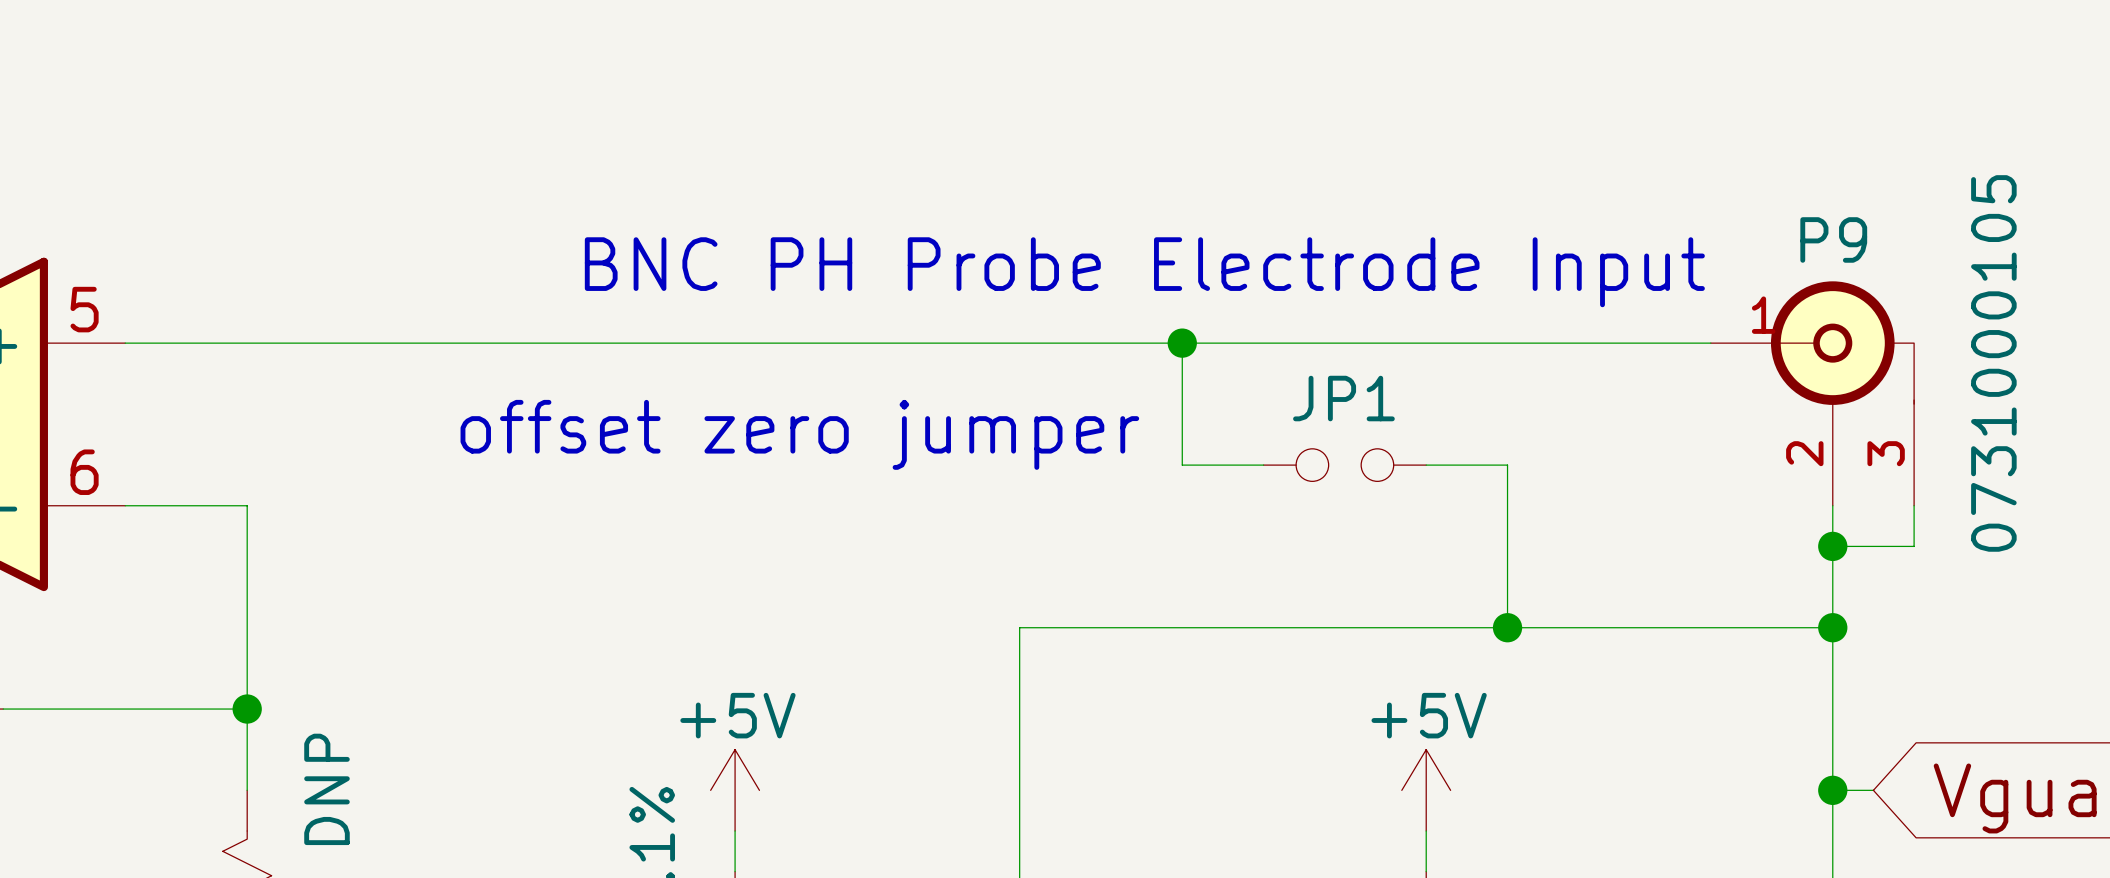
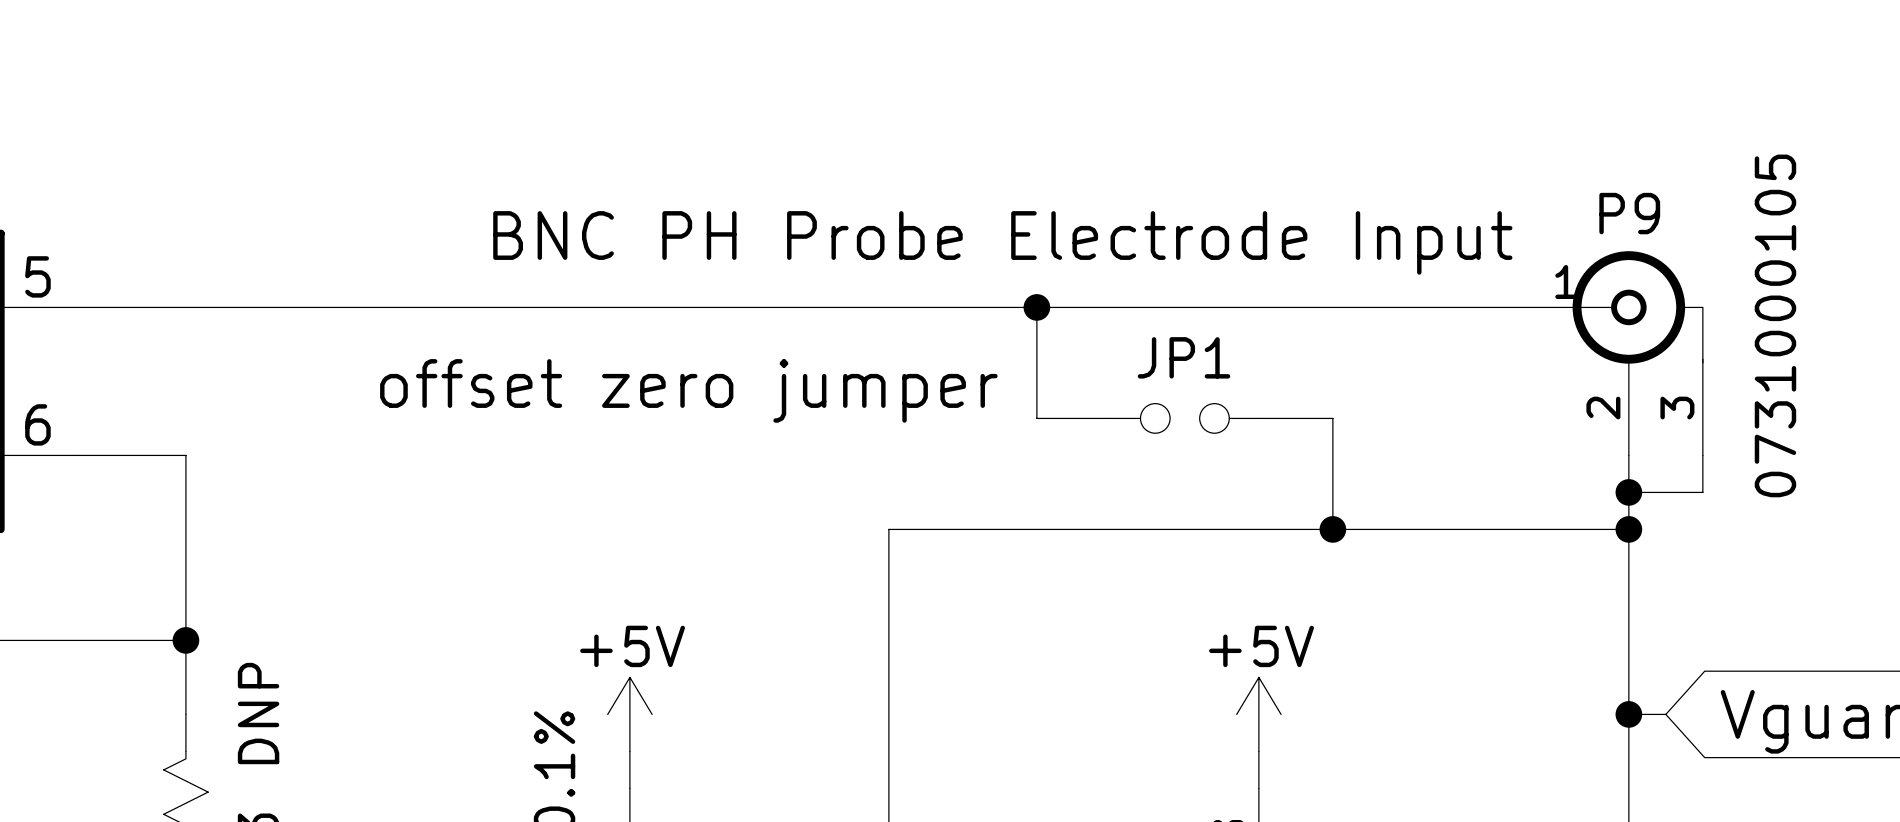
wire: (1507, 587) (1507, 627) -> none
wire: (1019, 627) (1832, 627) -> (888, 566) (888, 529) (1628, 529)
junction position: (1507, 627) -> (1332, 529)
junction position: (1832, 627) -> (1628, 529)

